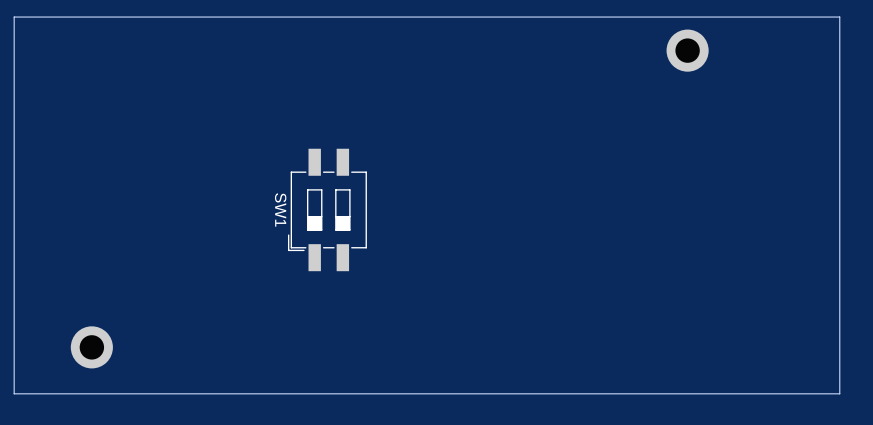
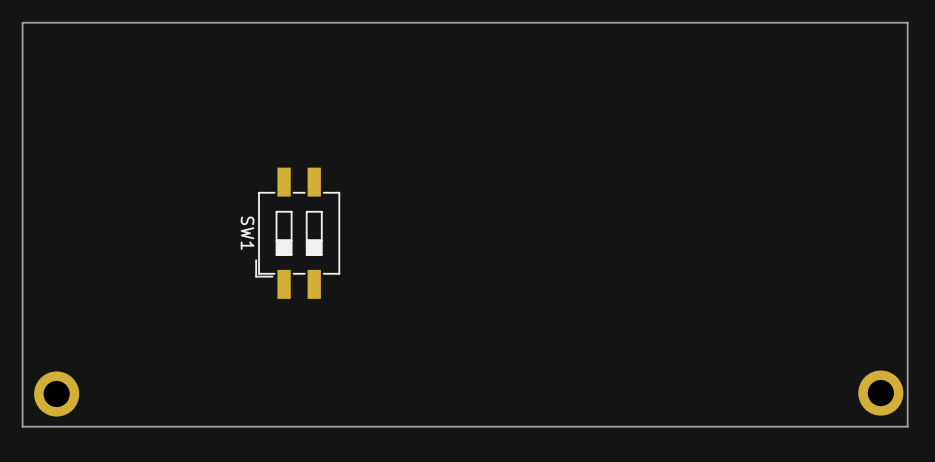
part: (687, 50) -> none
SW1 position: (327, 209) -> (297, 233)
part position: (91, 347) -> (56, 394)
part: none -> (880, 393)

